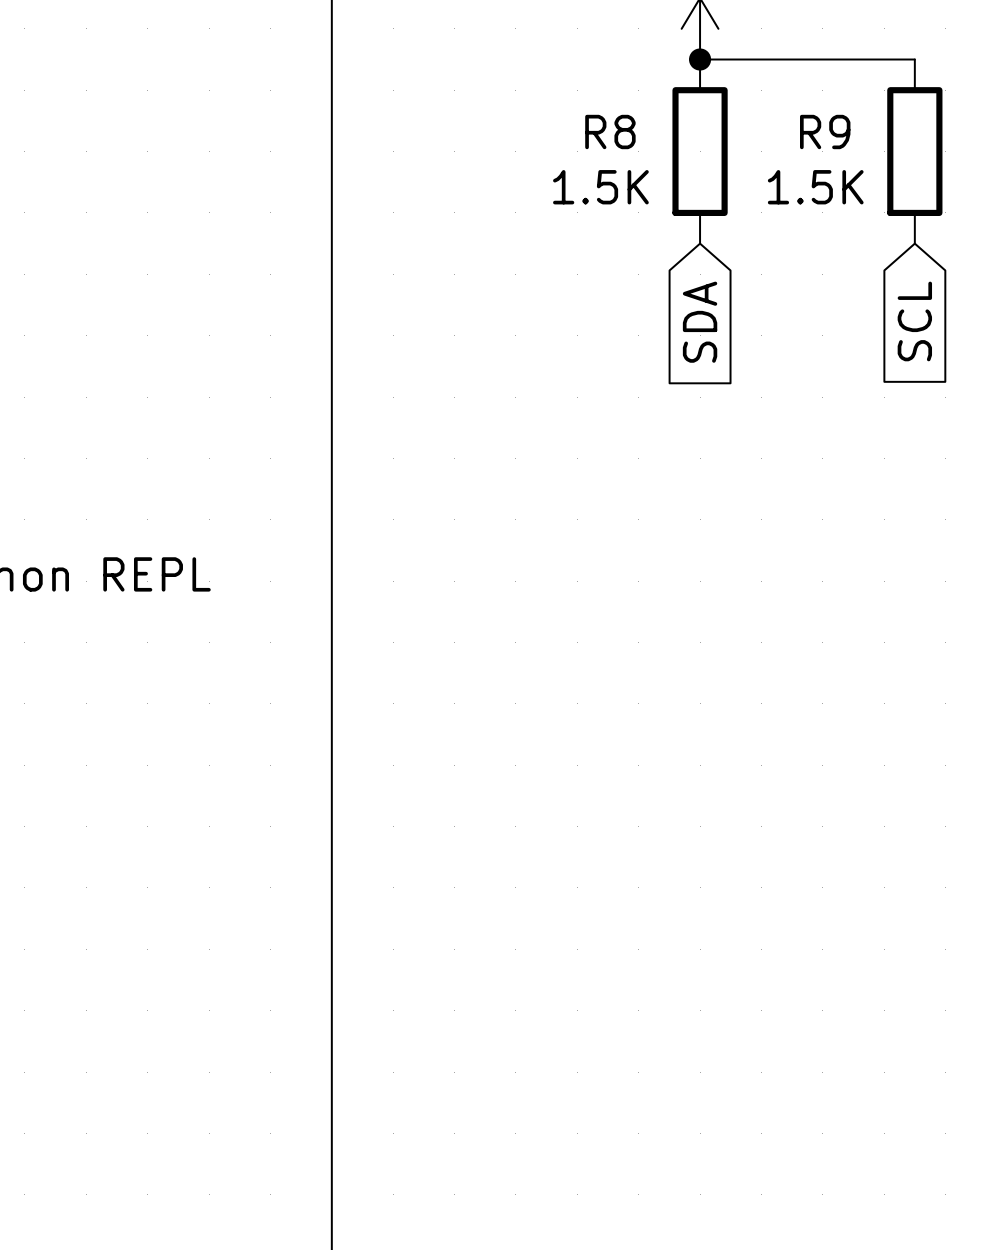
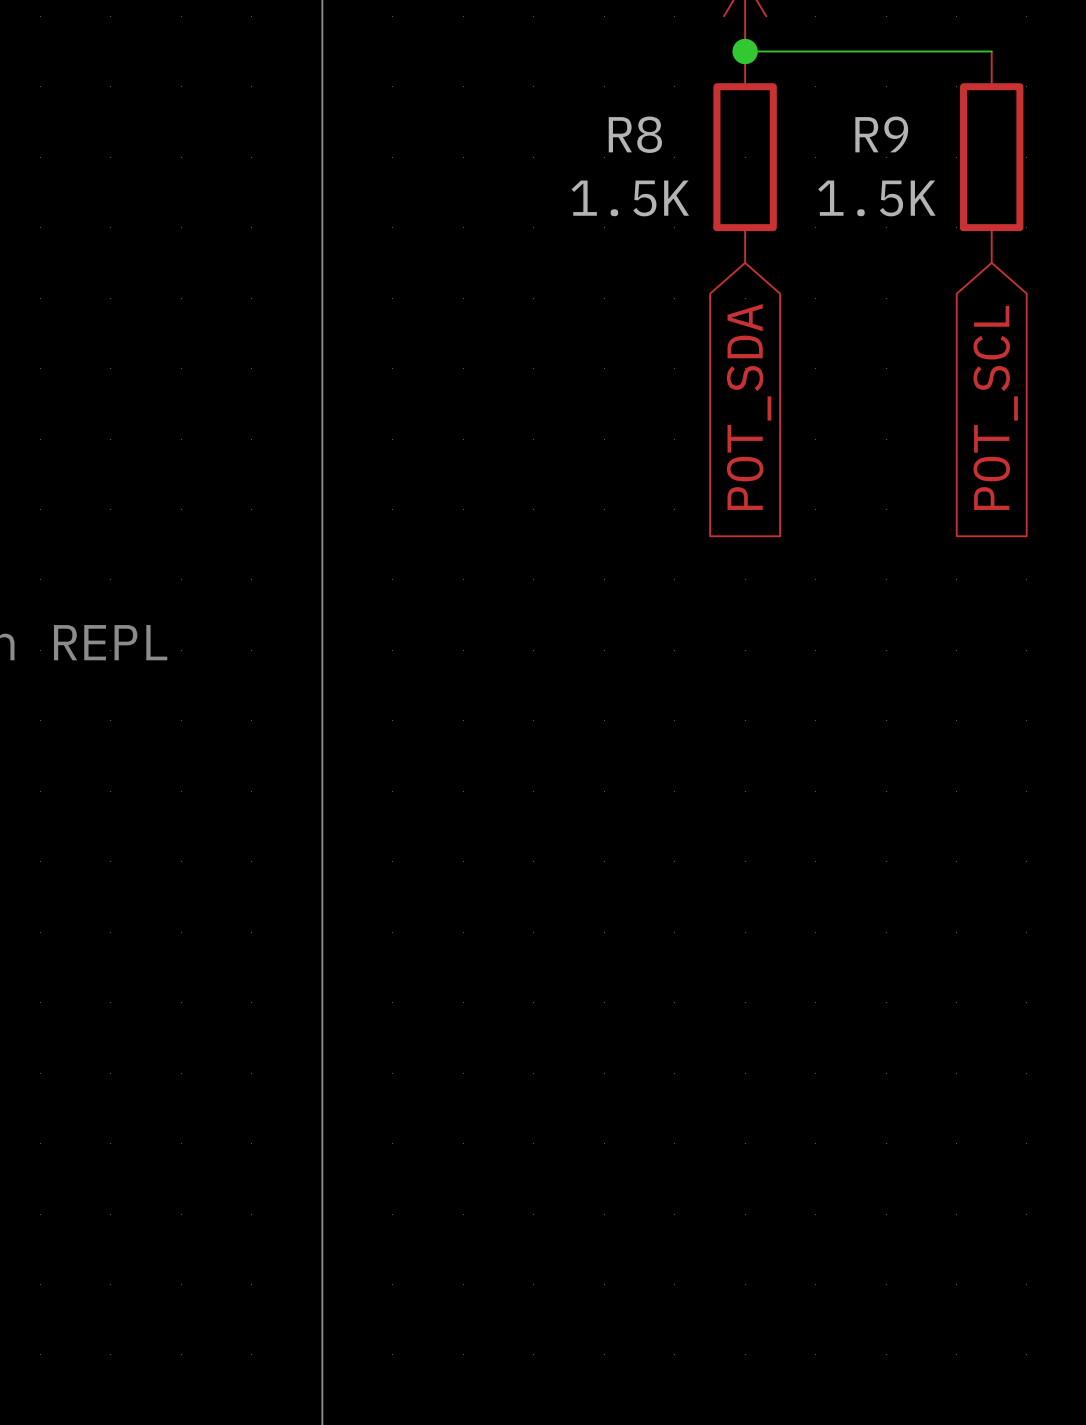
global label: SCL (914, 321) -> POT_SCL (995, 407)
global label: SDA (700, 322) -> POT_SDA (749, 406)

